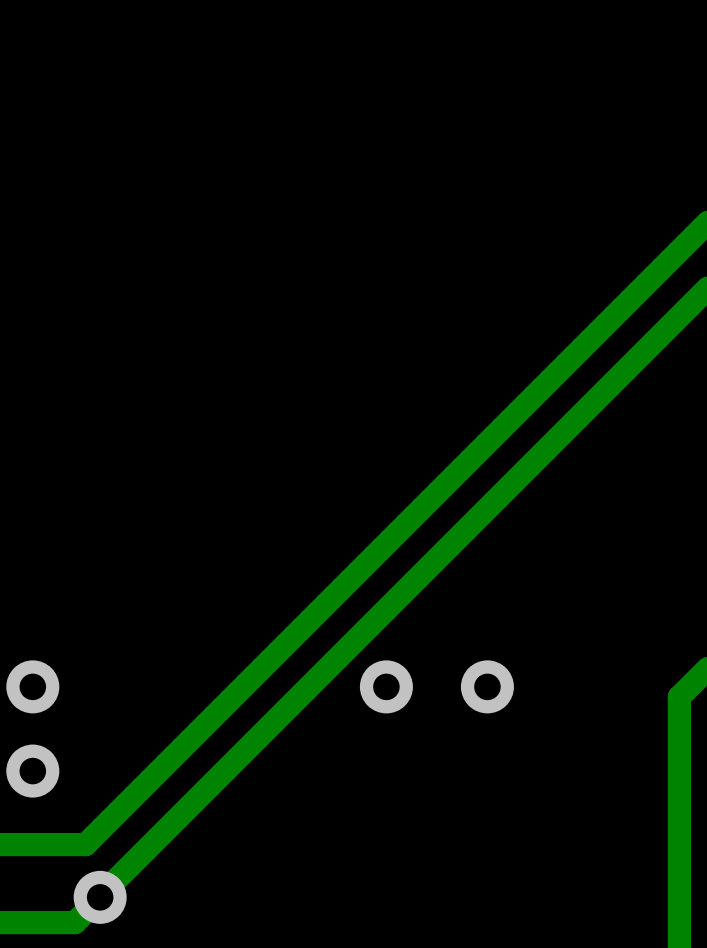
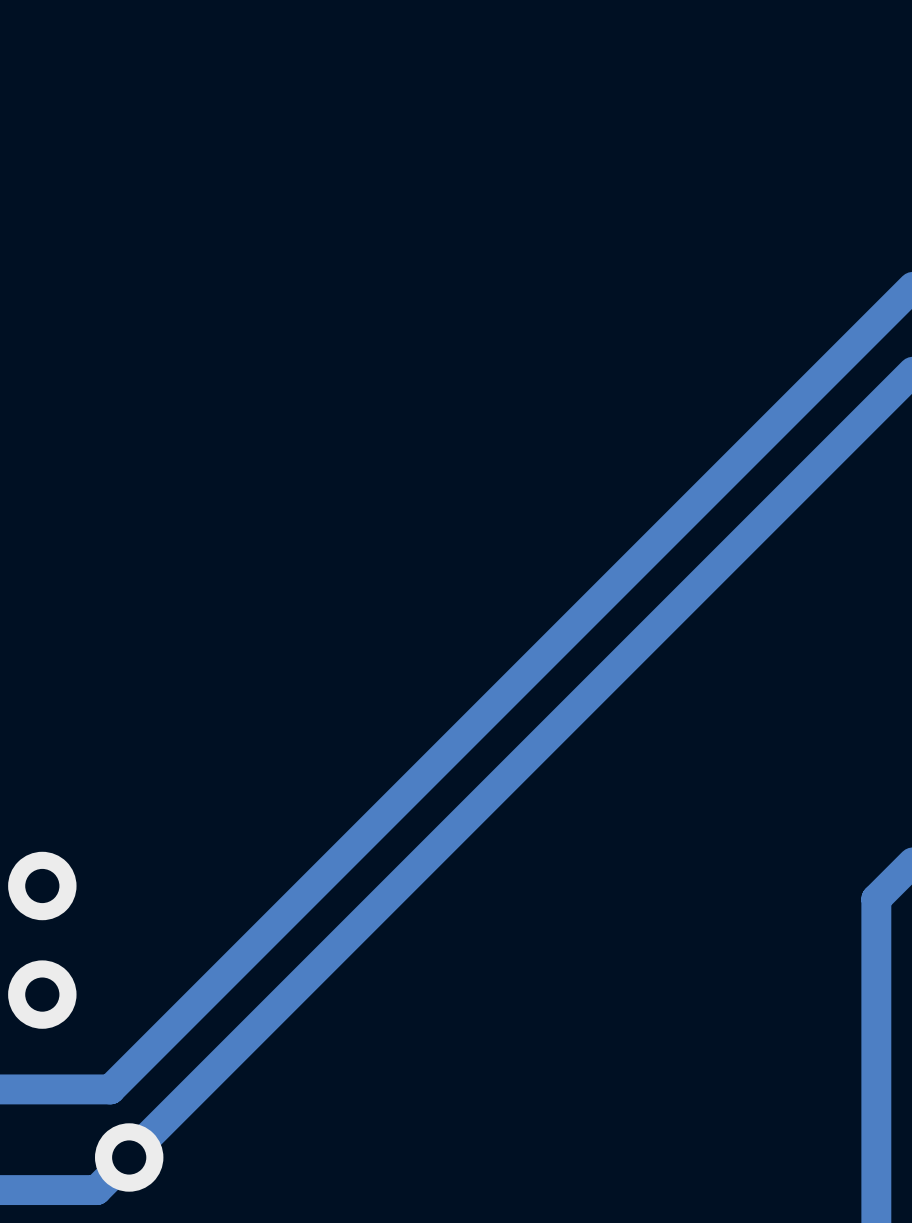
via: (386, 686) -> none
via: (487, 686) -> none

